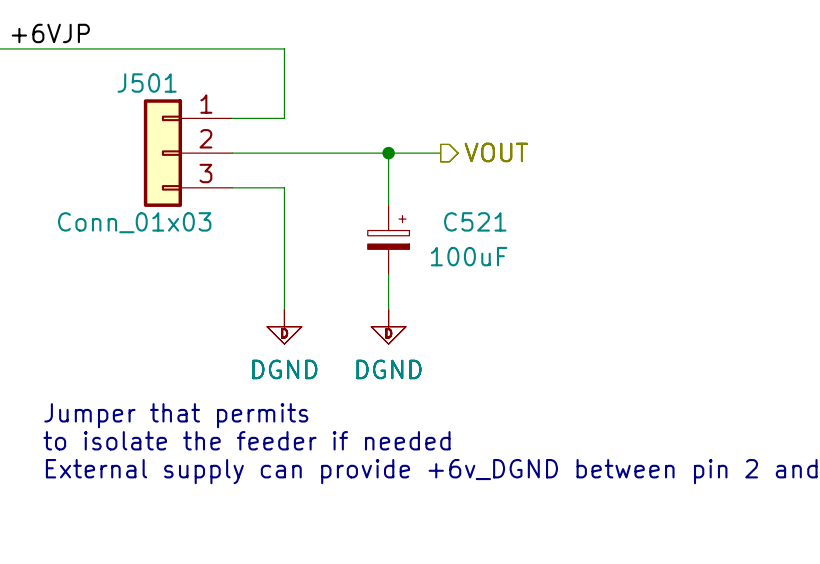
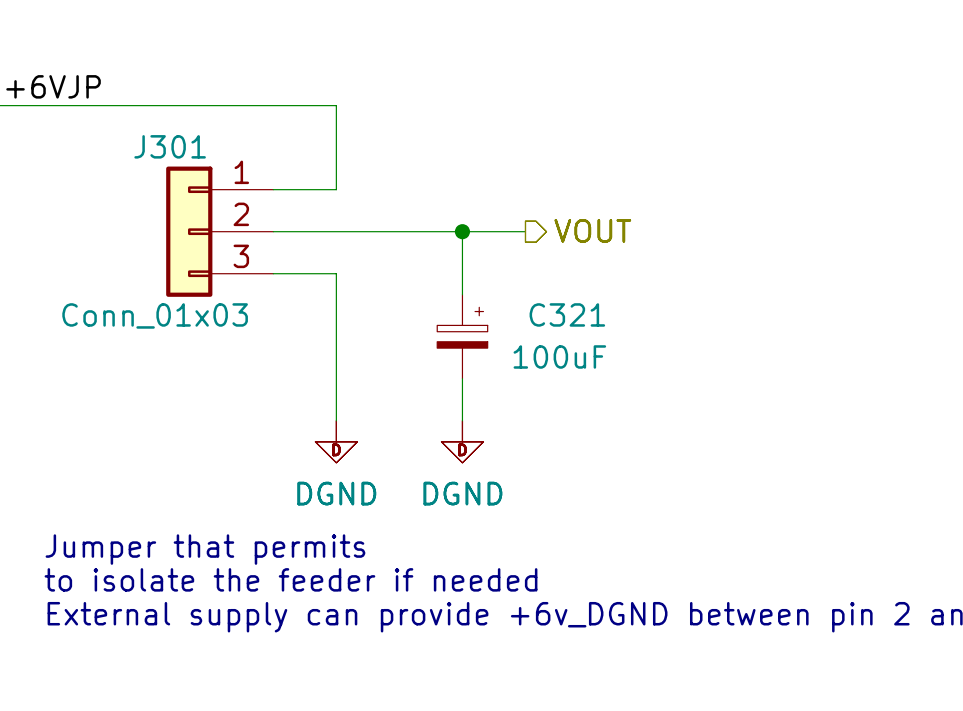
J501 name: J501 (147, 83) -> J301 (170, 146)
C521 name: C521 (475, 221) -> C321 (567, 314)

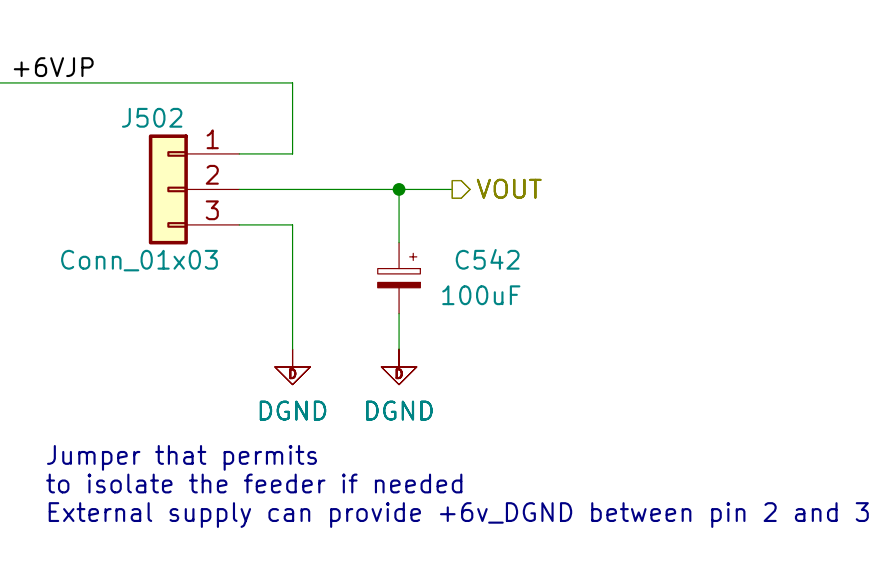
J301 name: J301 (170, 146) -> J502 (152, 117)
C321 name: C321 (567, 314) -> C542 (487, 259)

